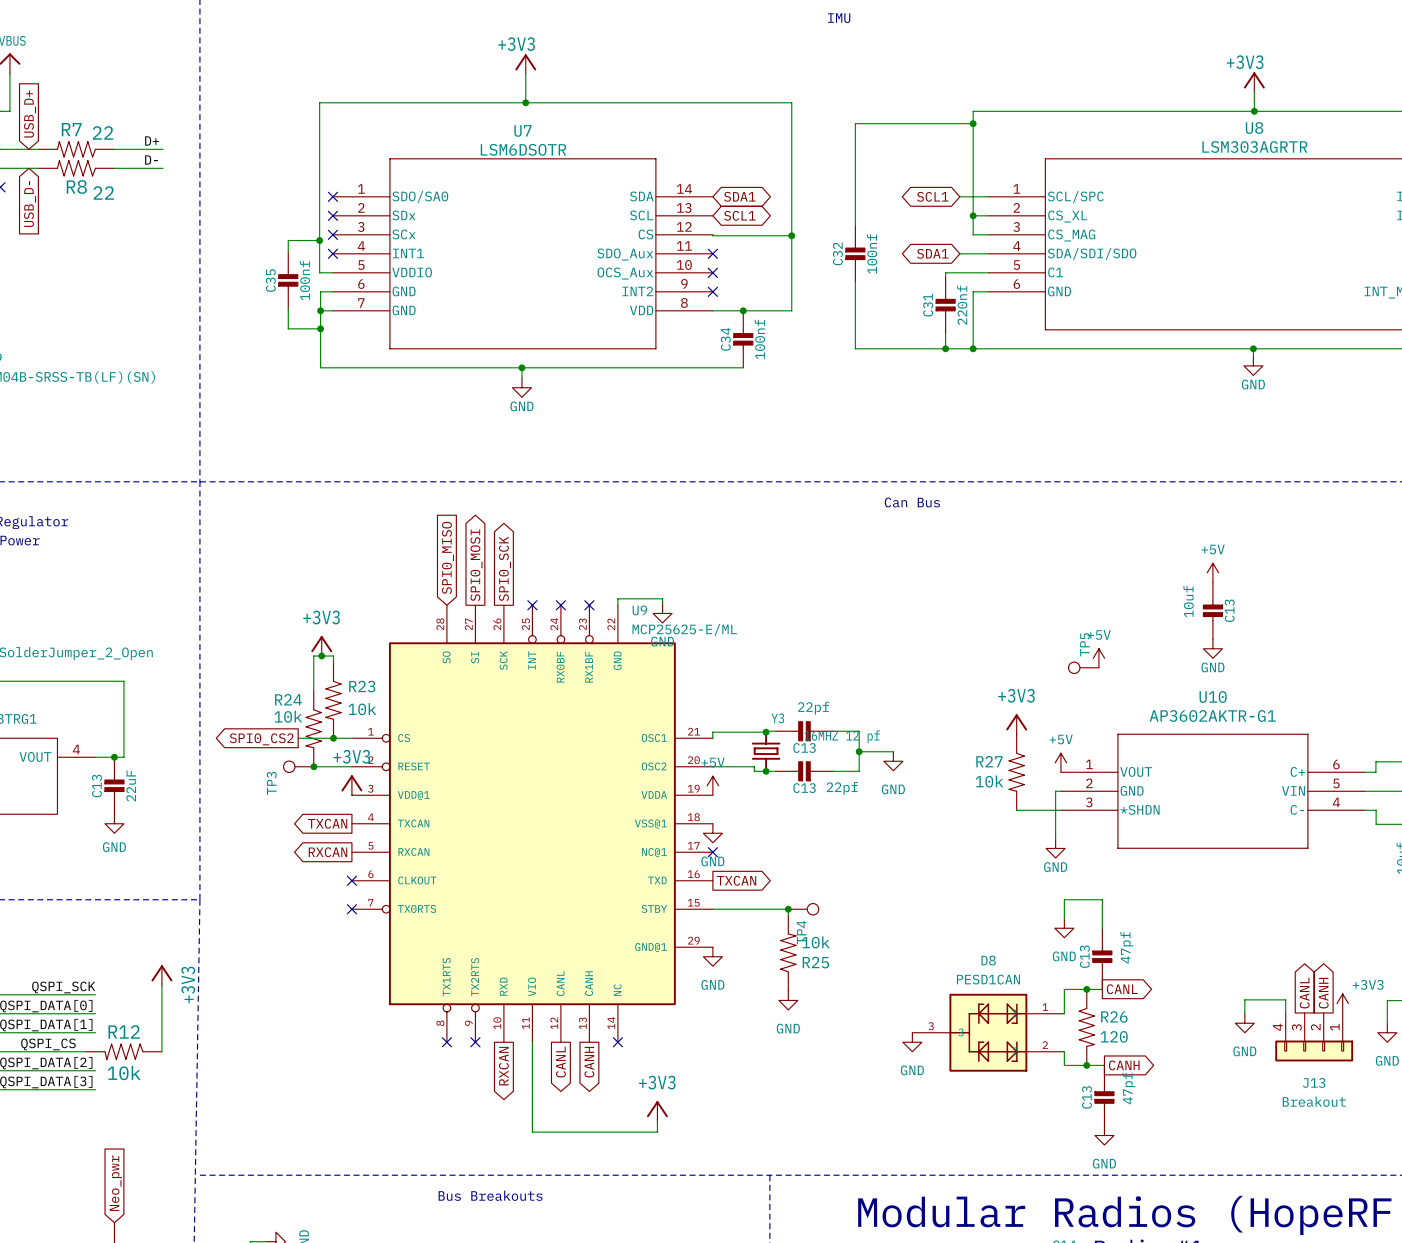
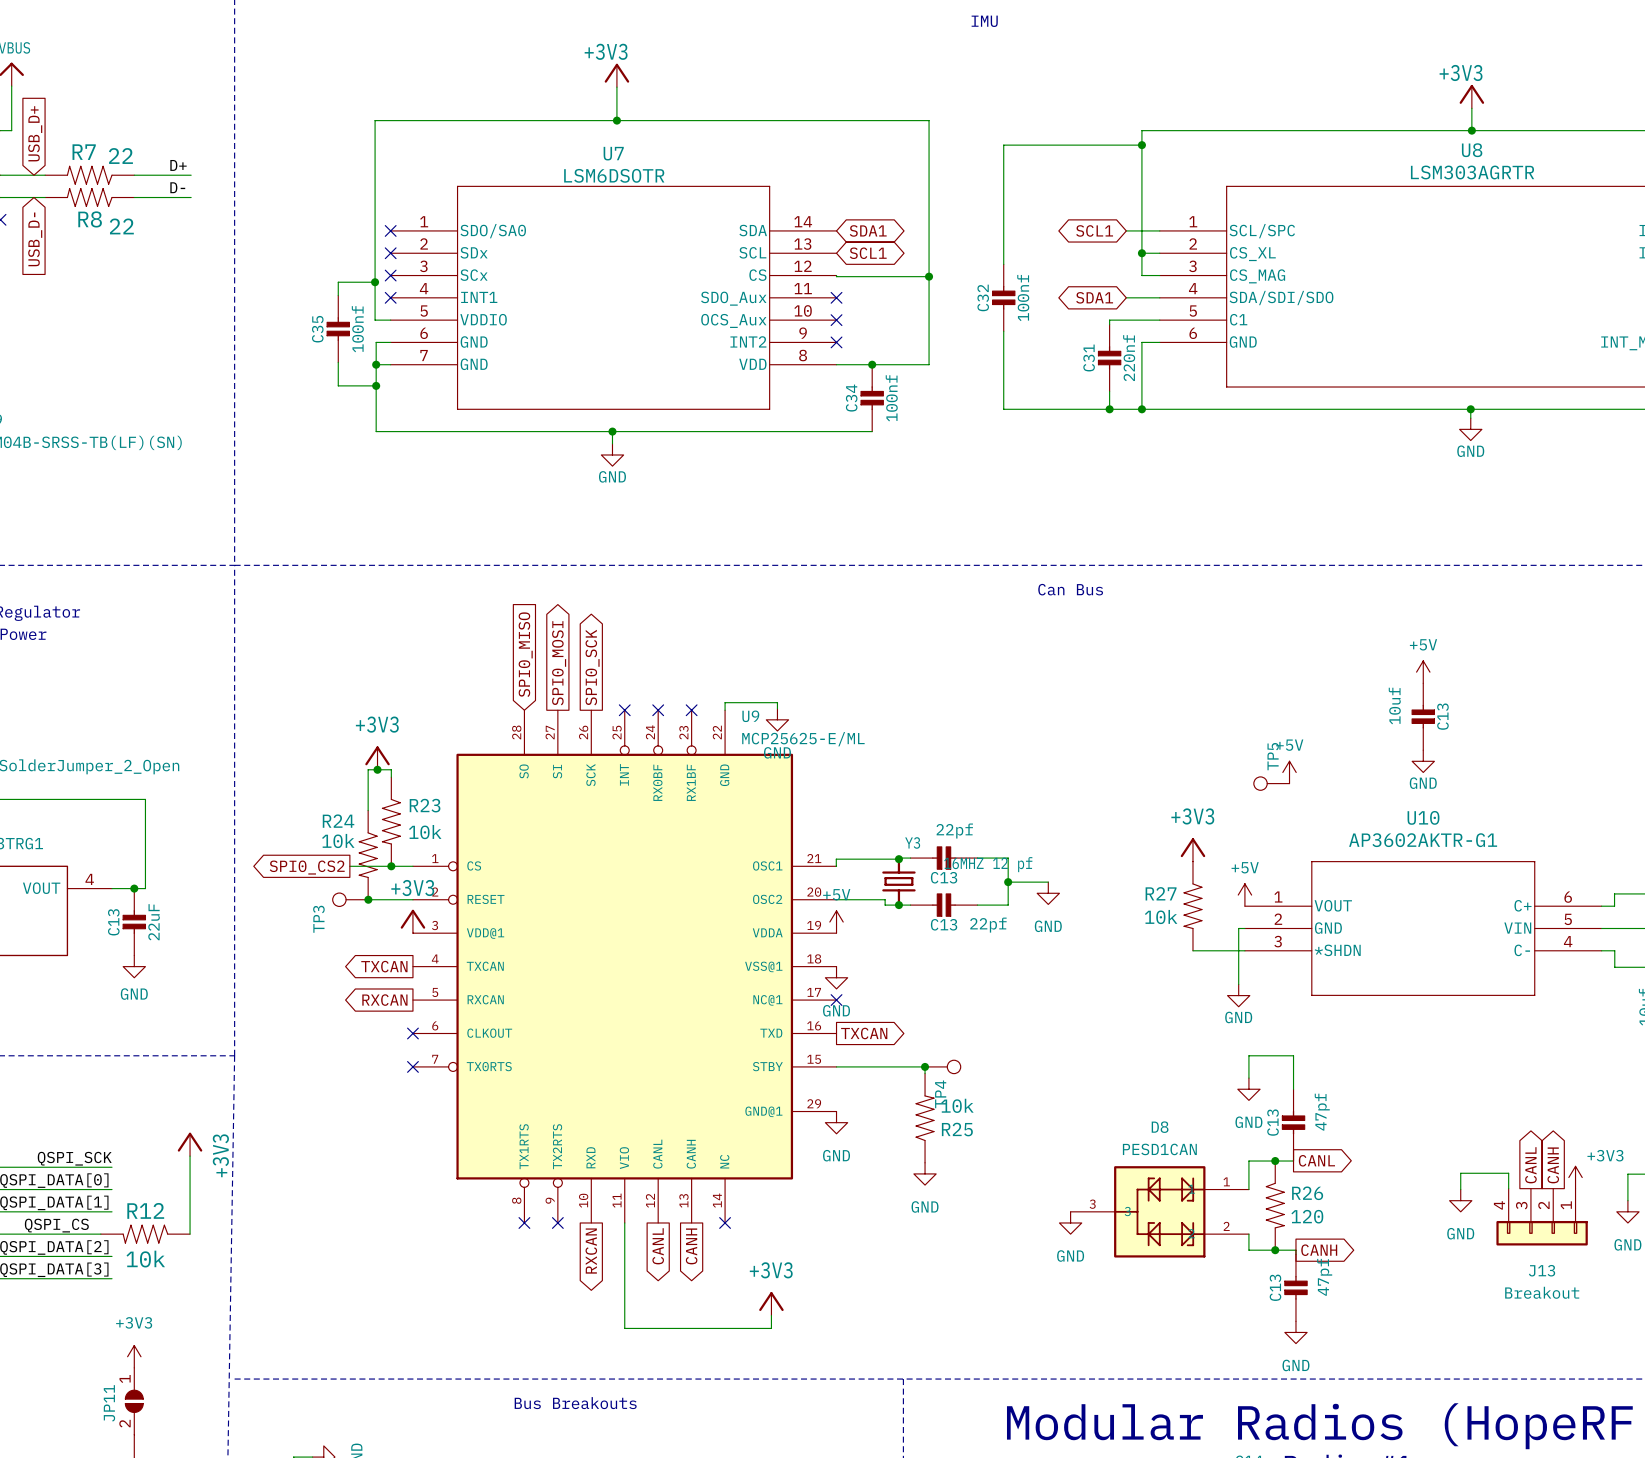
power symbol: none -> +3V3 (134, 1356)
global label: Neo_pwr (115, 1183) -> none
JP11: none -> (134, 1401)

